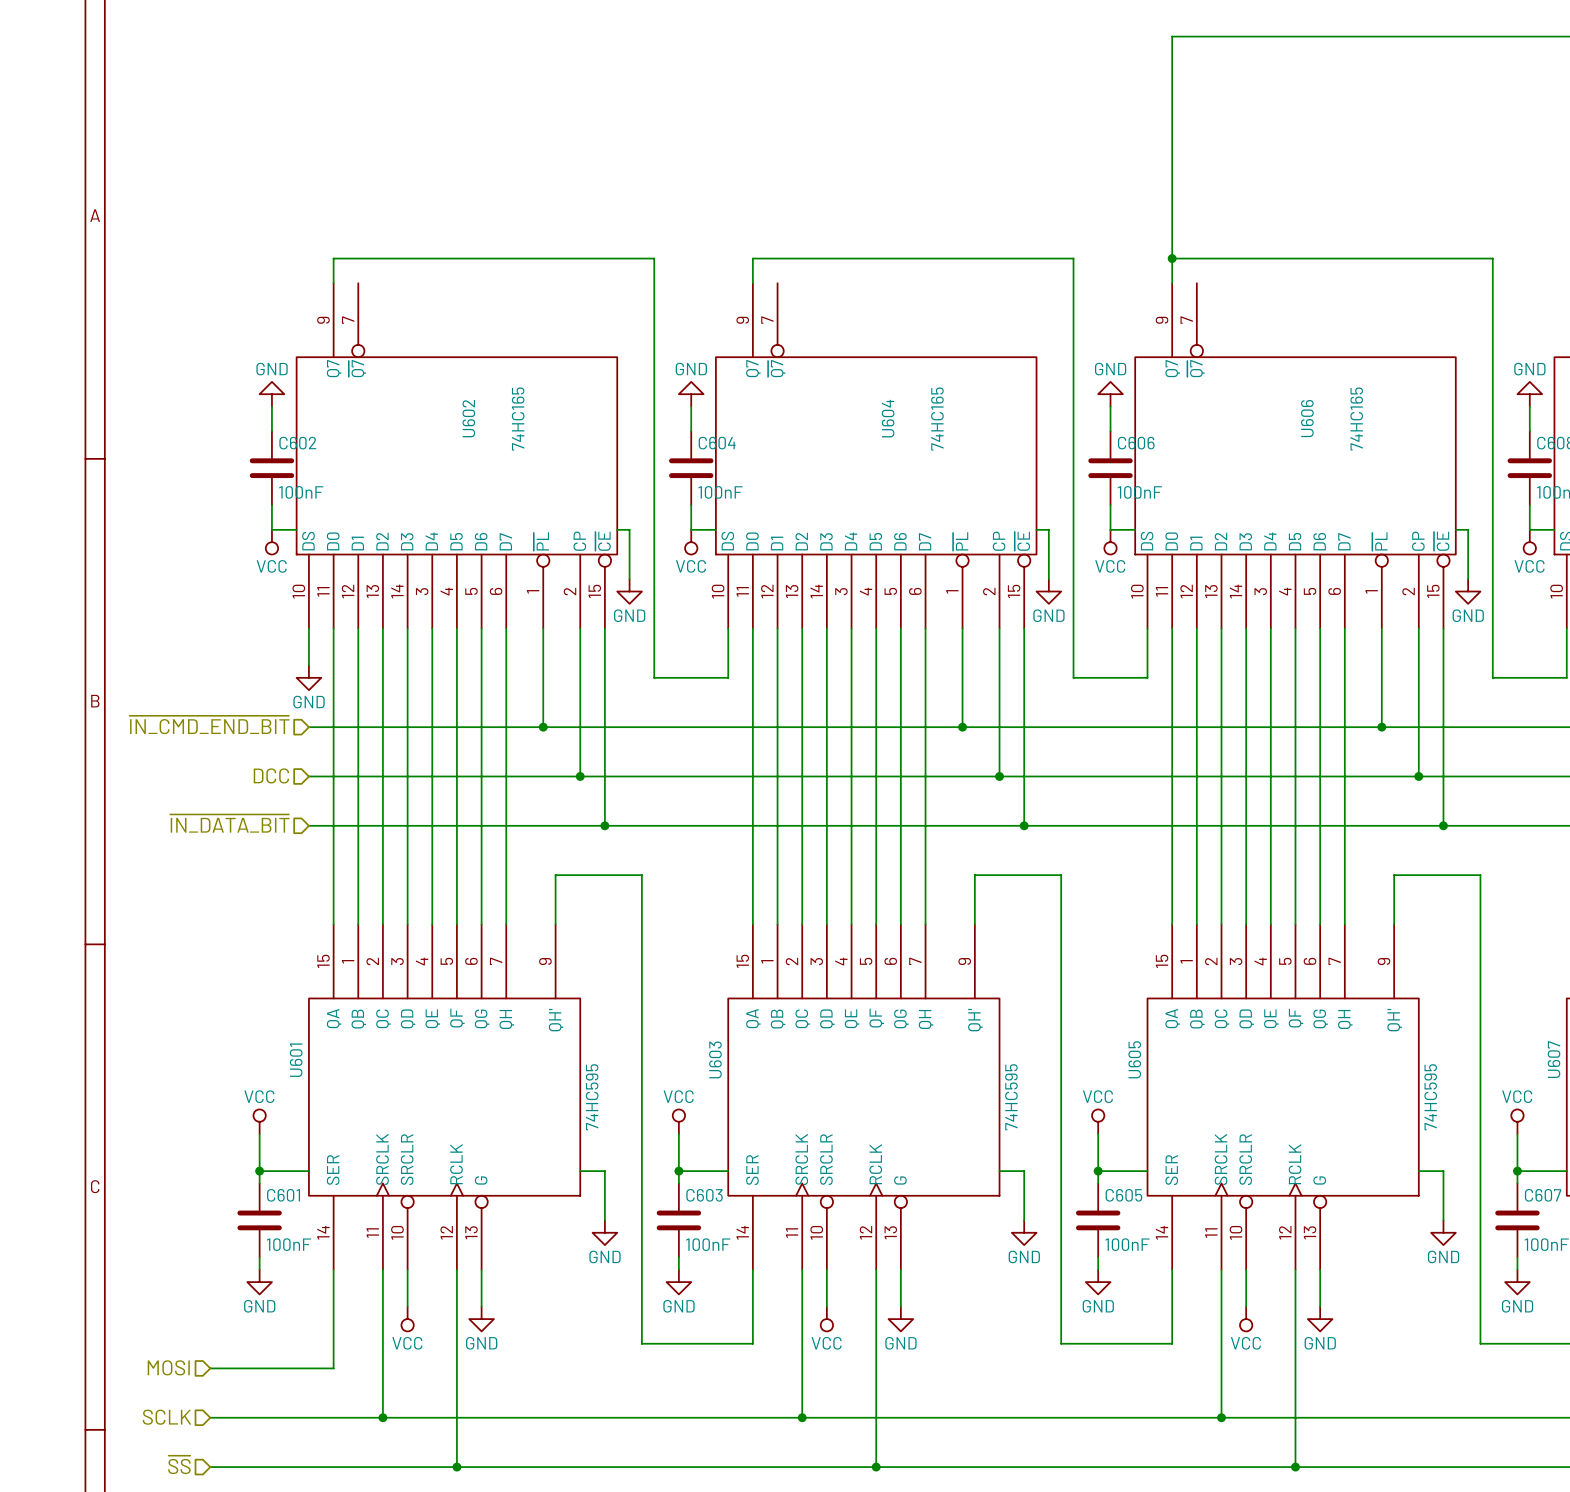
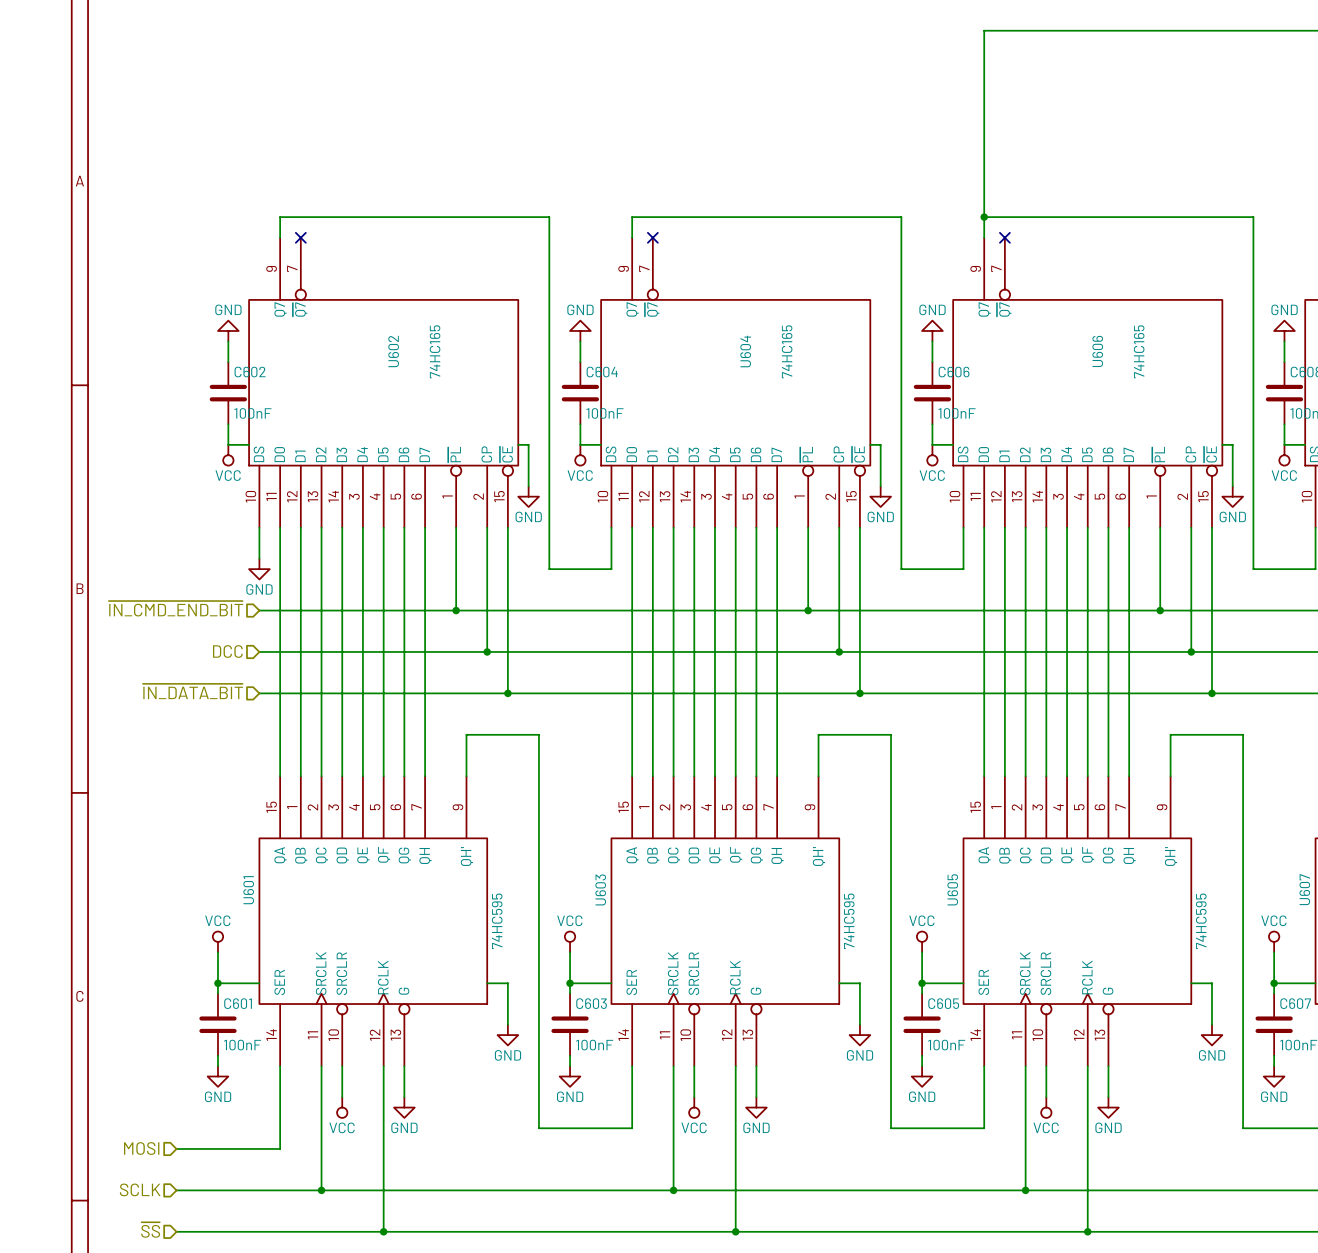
no-connect mark: none -> (300, 237)
no-connect mark: none -> (652, 237)
no-connect mark: none -> (1004, 237)

